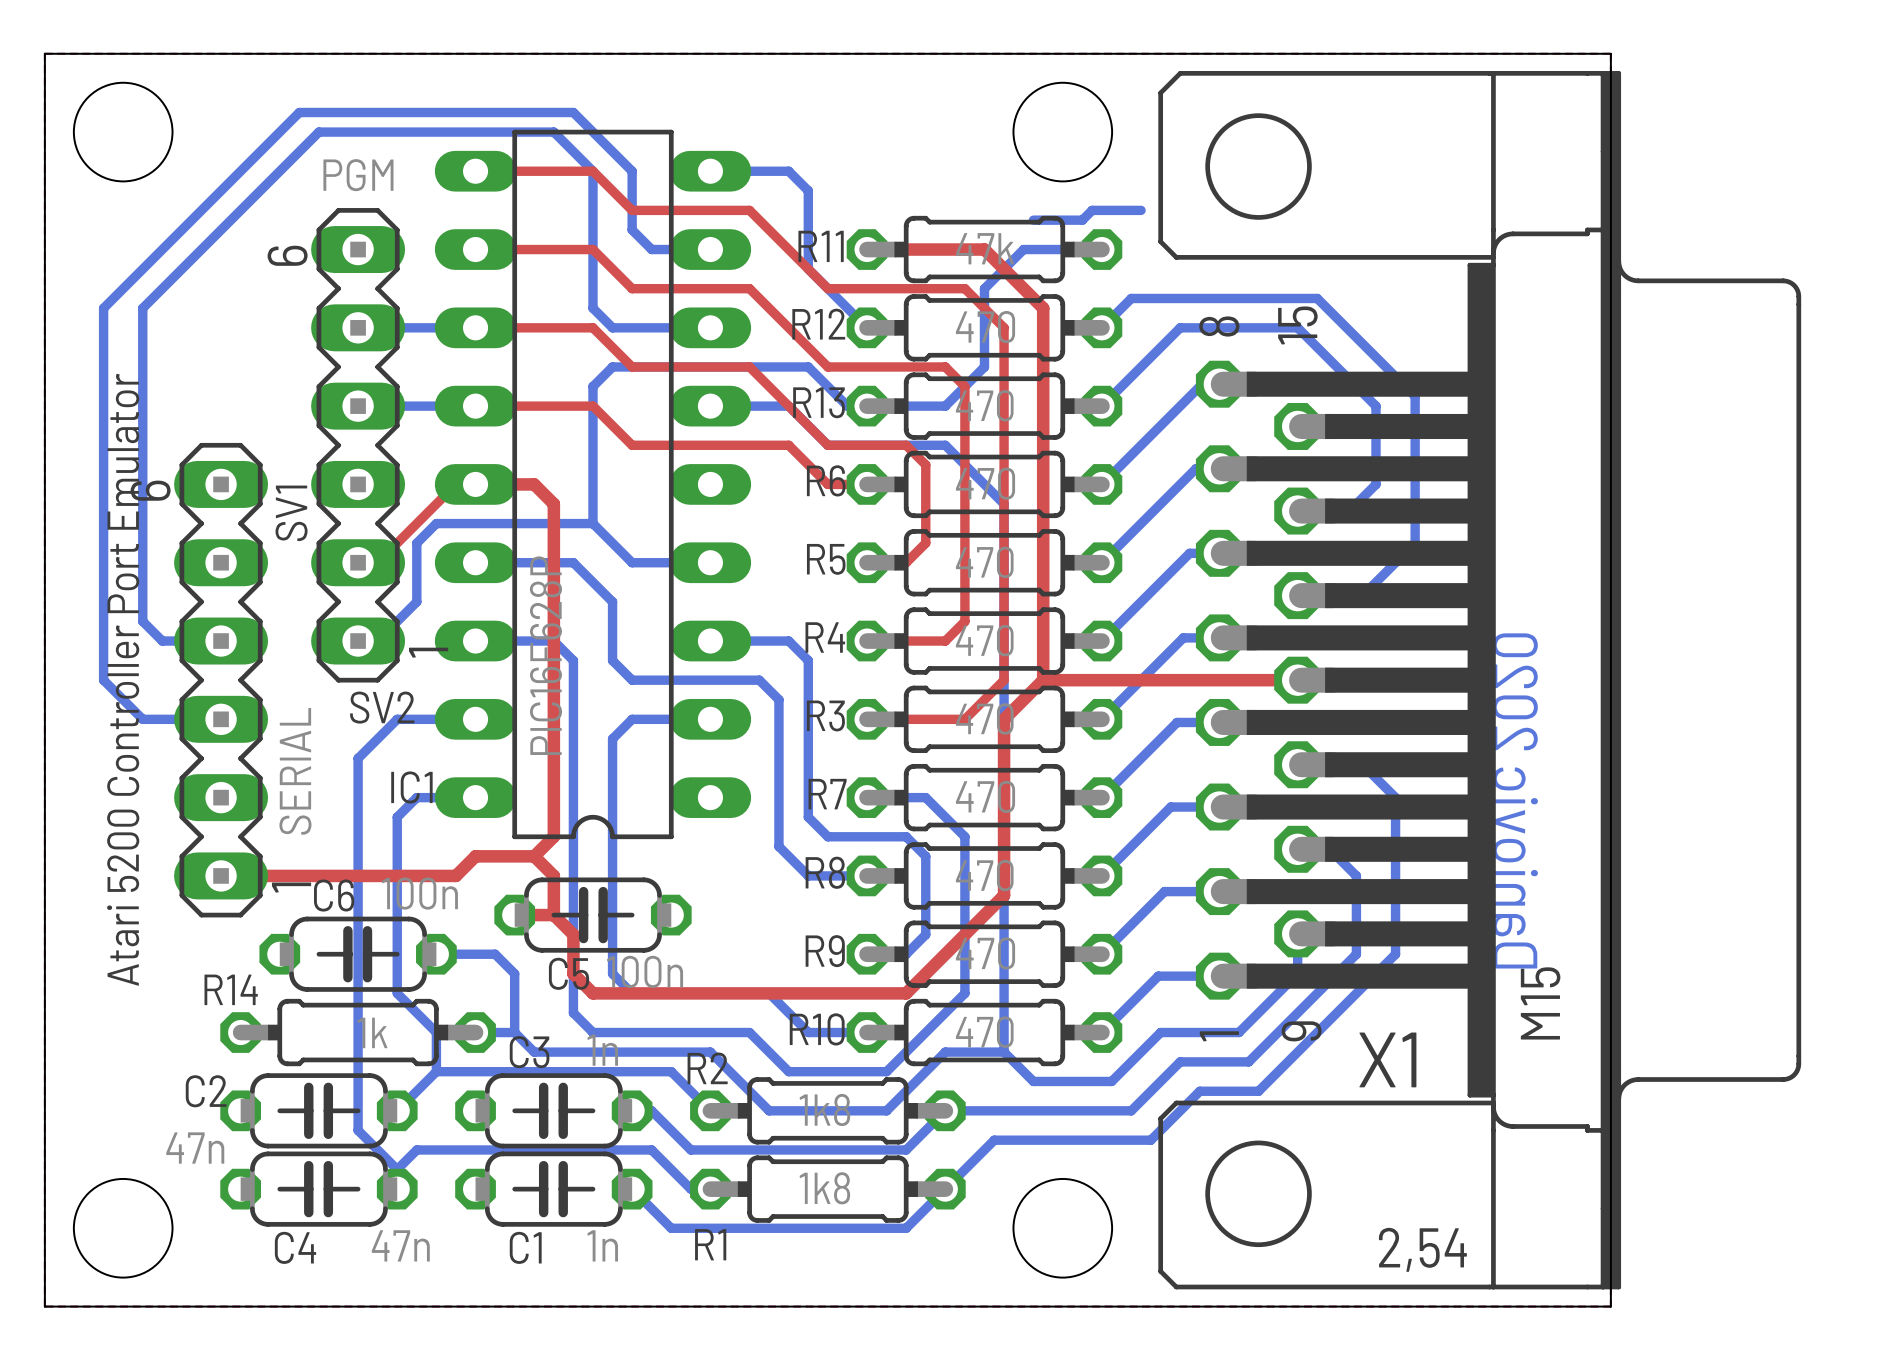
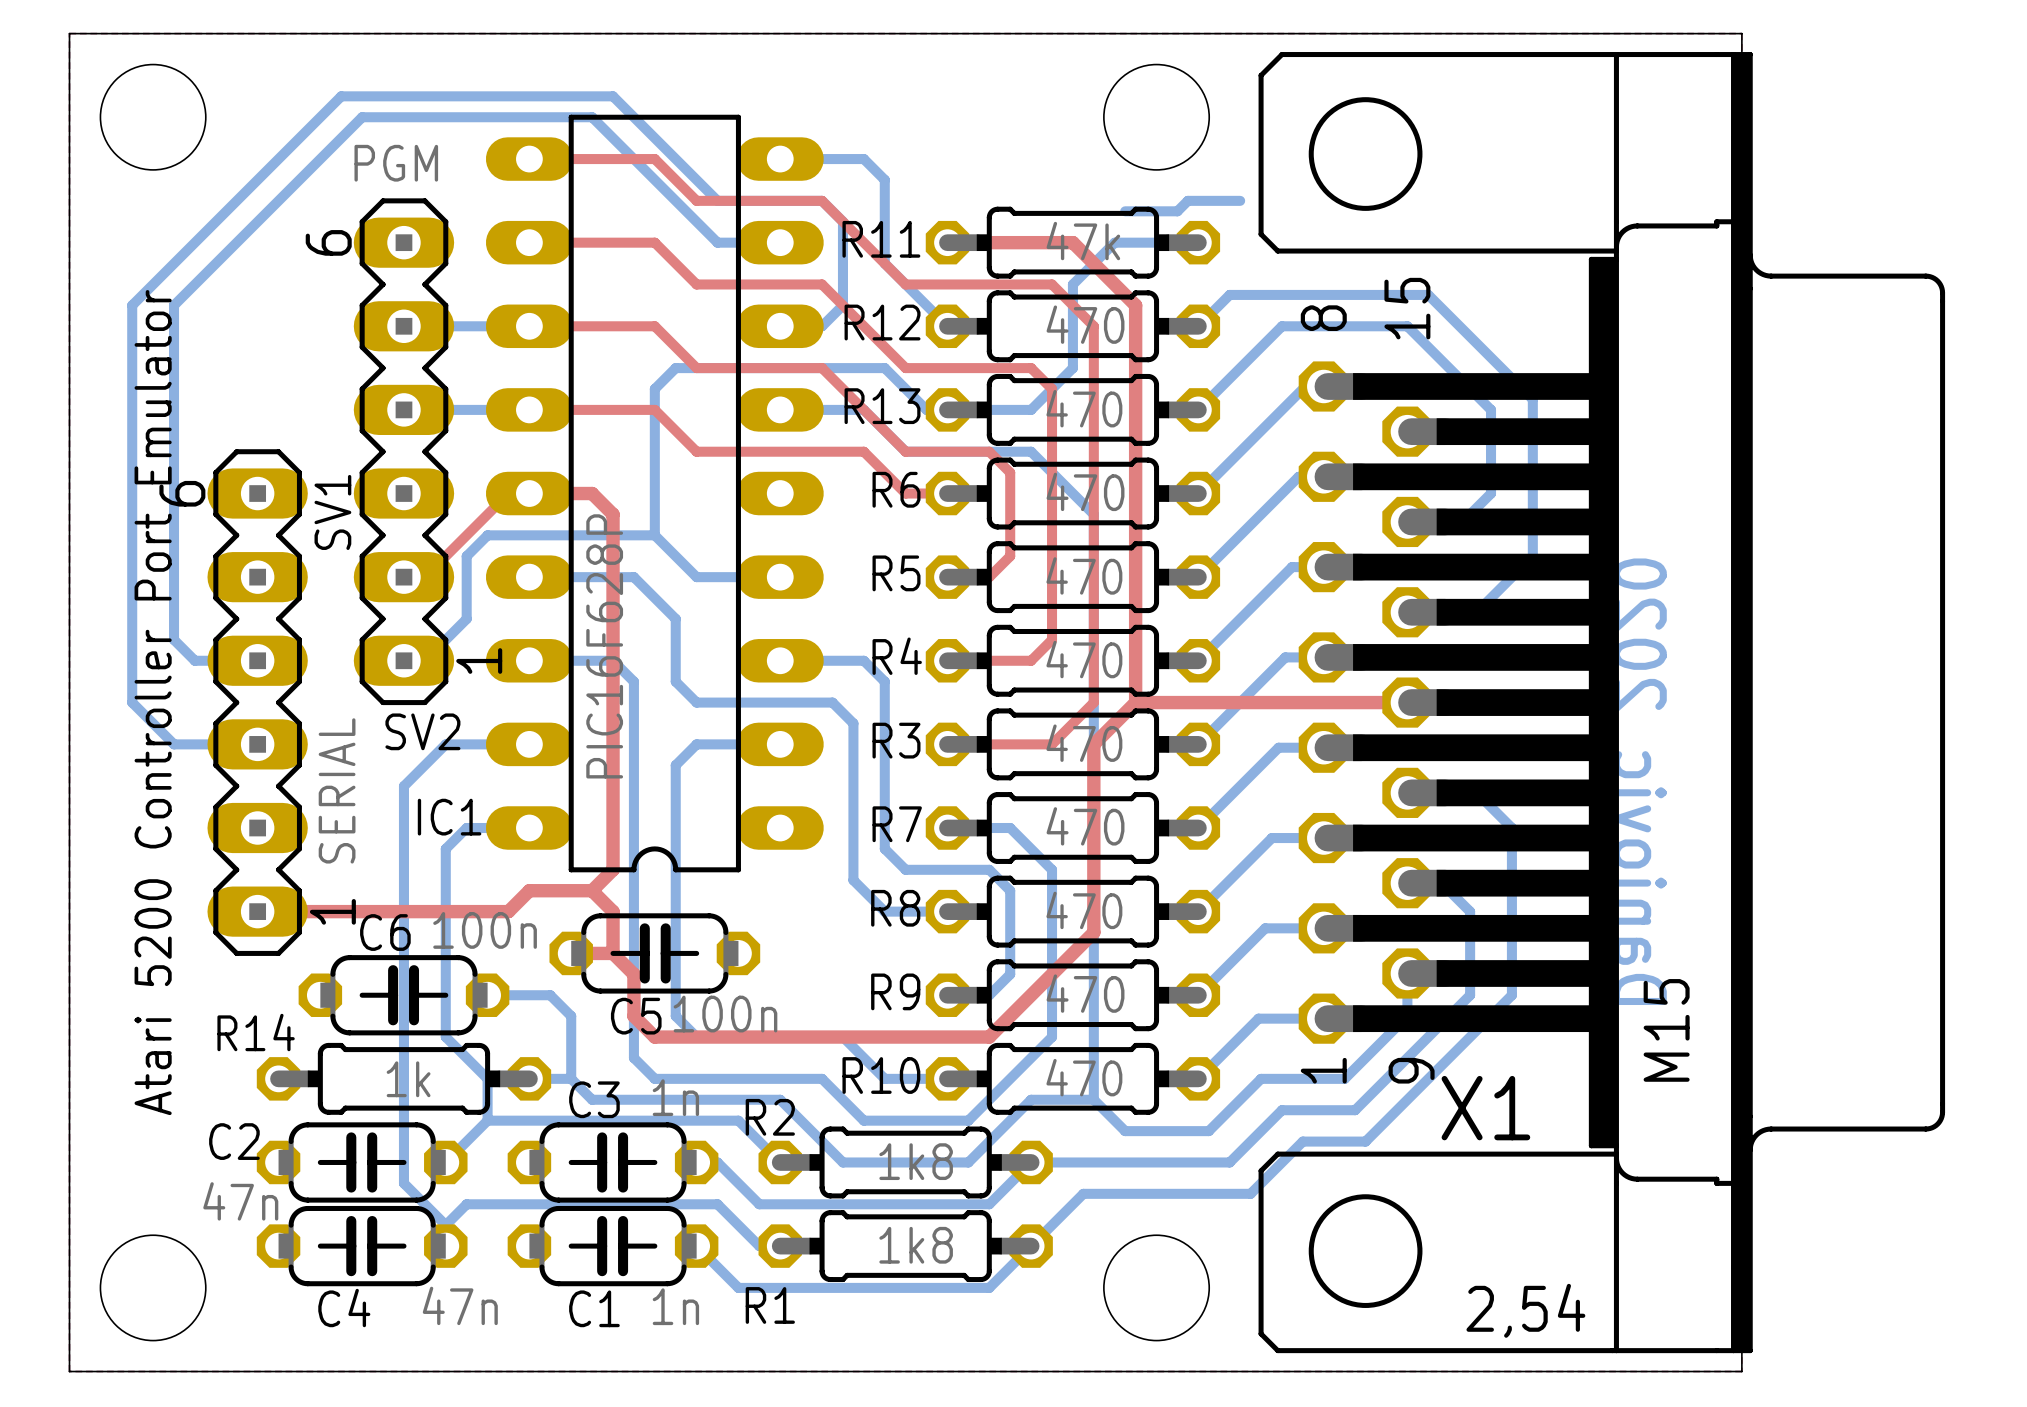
bottom track: (553, 112) (573, 112) (632, 171) (632, 229) -> (592, 117) (696, 221)
bottom track: (534, 132) (553, 132) (592, 171) (592, 308) (612, 327) (710, 327) -> (613, 96) (717, 200) (822, 200) (842, 221) (842, 305) (822, 326) (780, 326)

